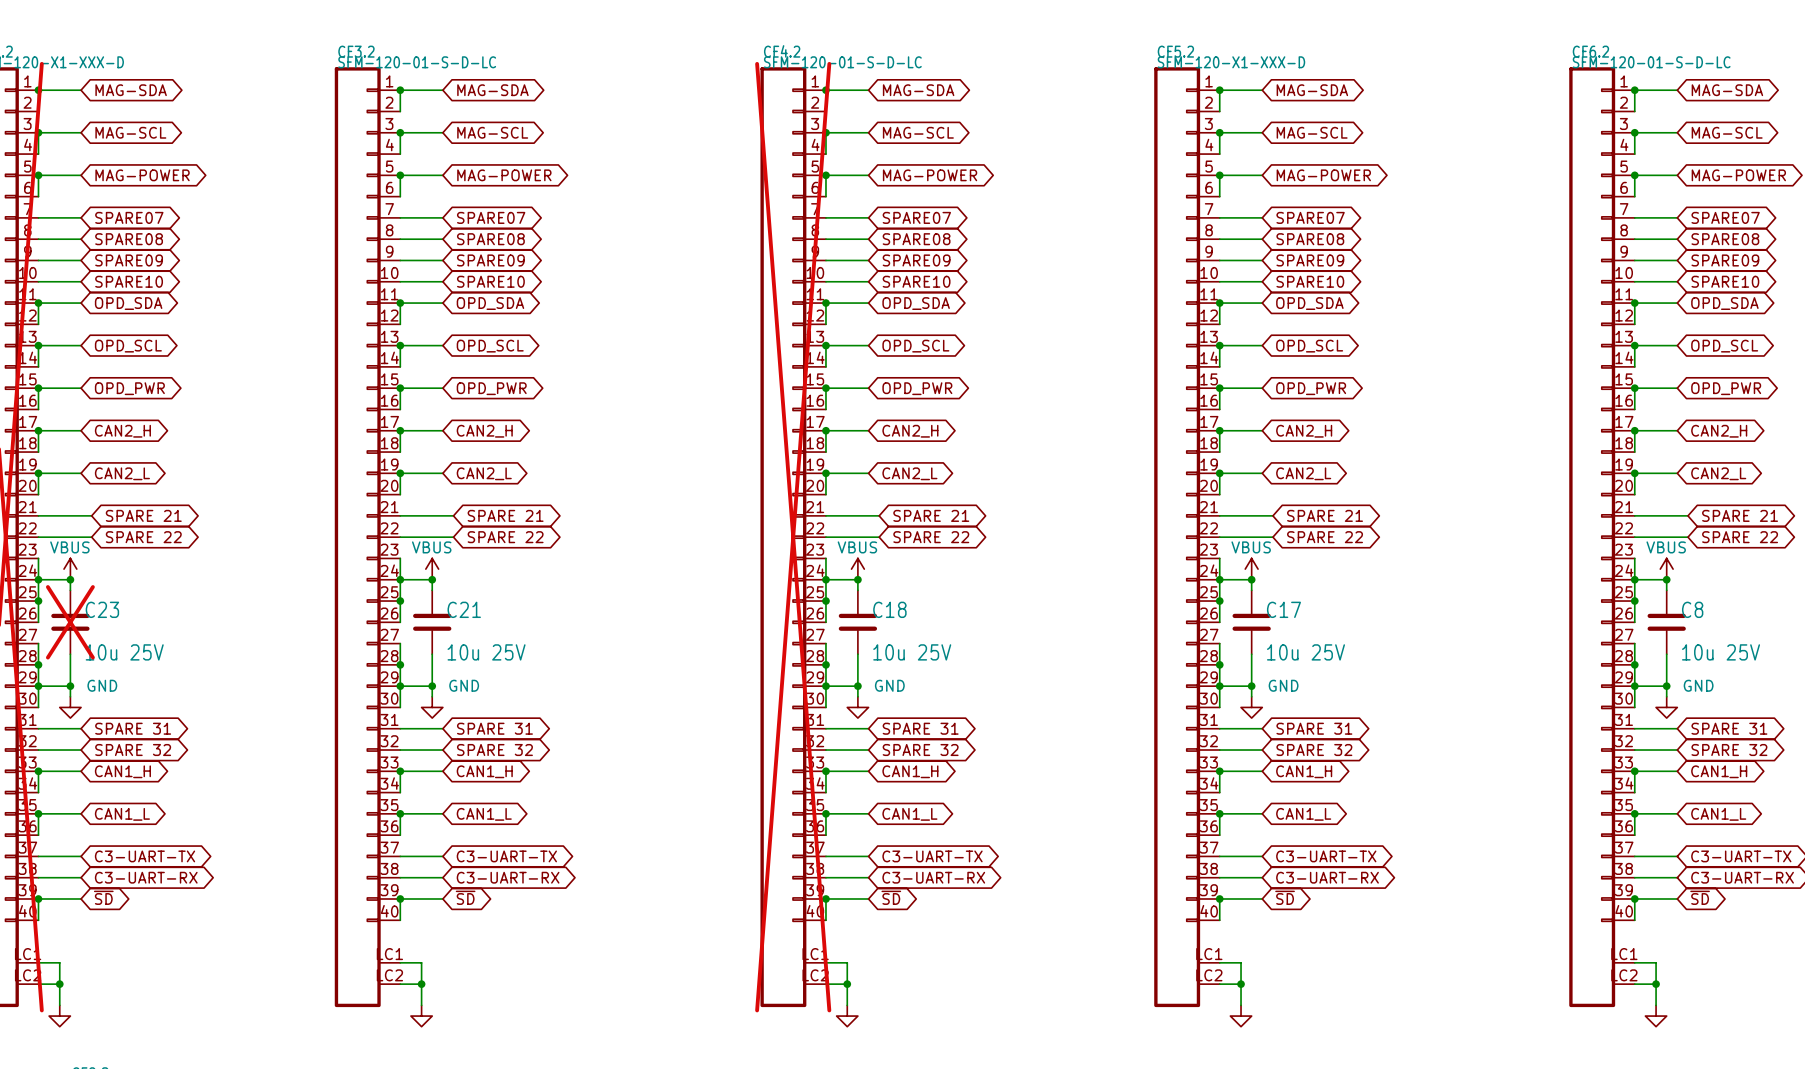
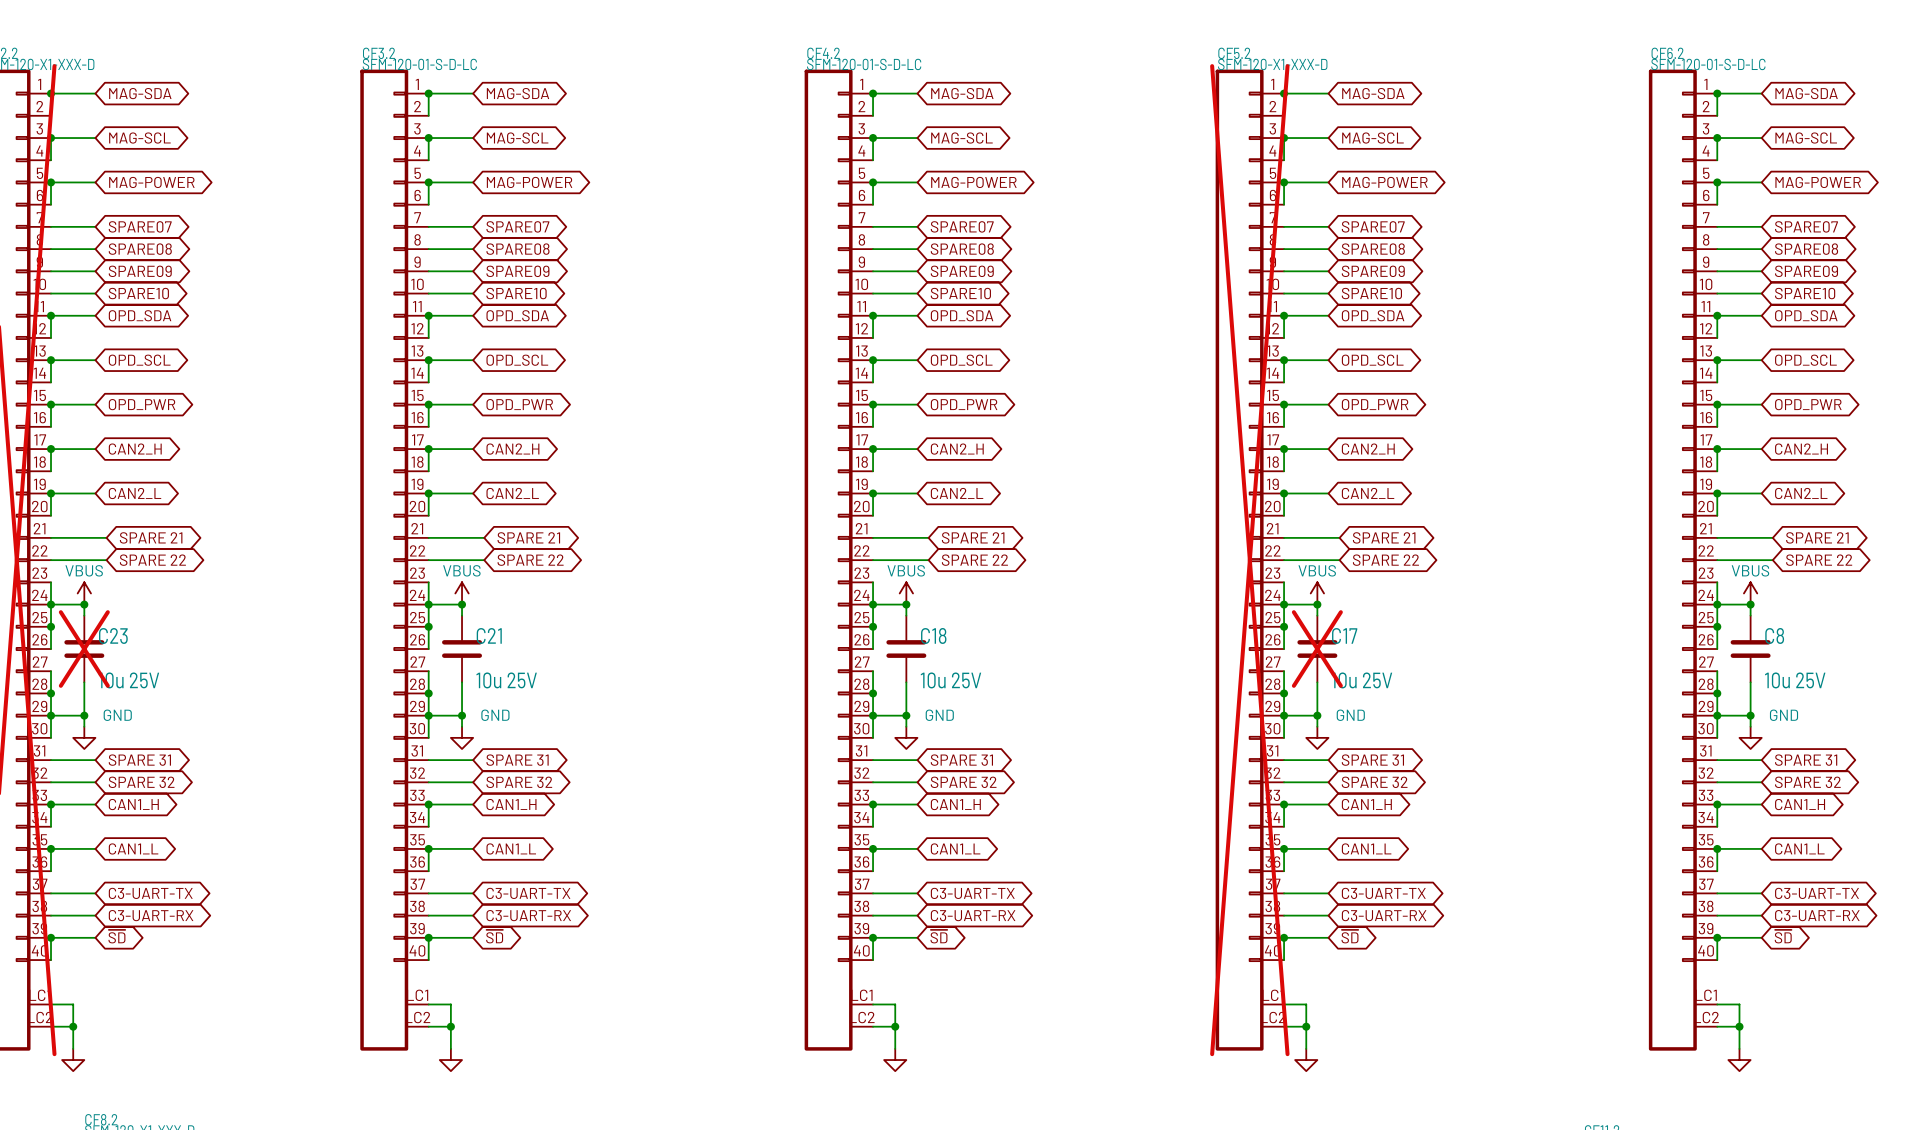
CF4.2 do-not-place cross: (793, 537) -> none
CF5.2 do-not-place cross: none -> (1249, 560)
C17 do-not-place cross: none -> (1317, 649)

